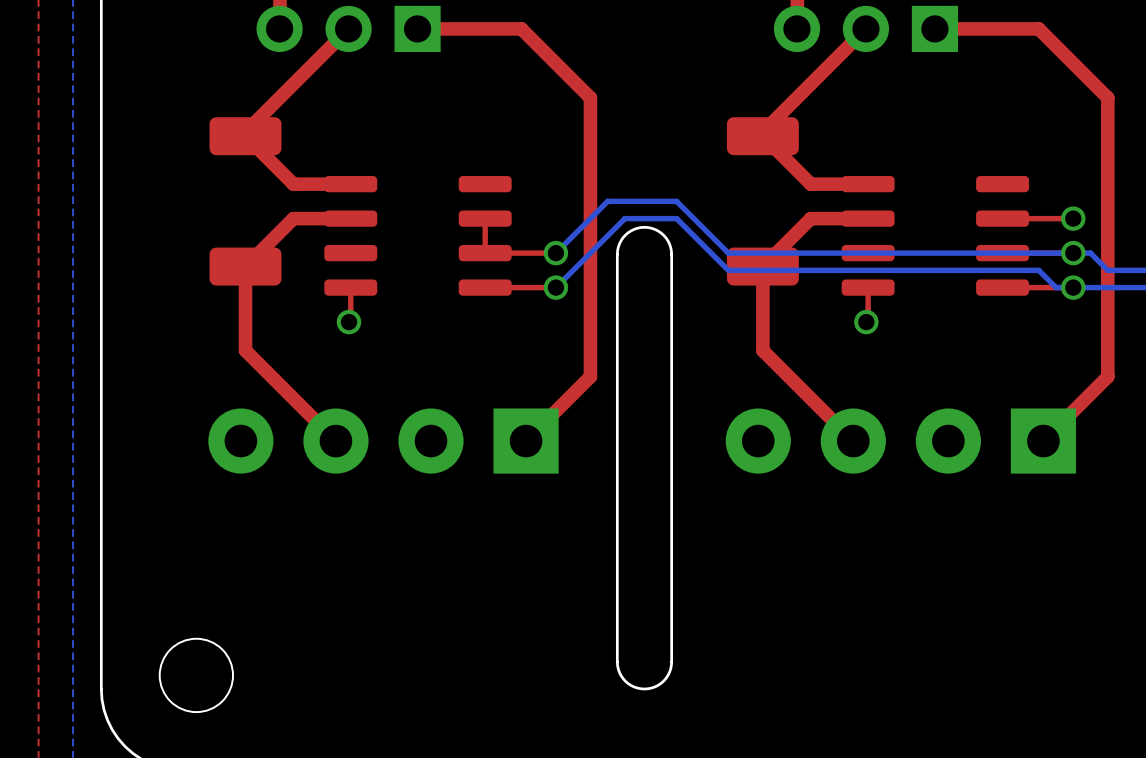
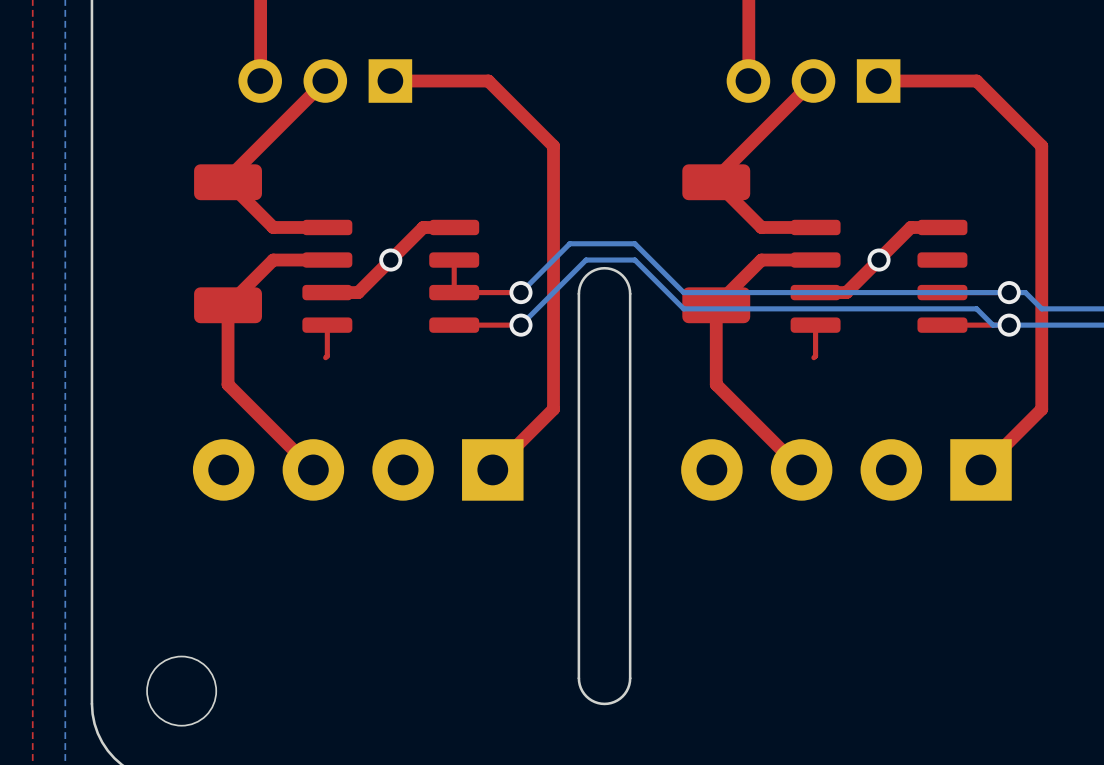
top track: none -> (454, 227) (423, 227) (358, 292) (327, 292)
top track: none -> (942, 227) (910, 227) (846, 292) (815, 292)
via: none -> (879, 260)
top track: (1073, 218) (1002, 218) -> none
via: (1073, 218) -> none
via position: (349, 322) -> (390, 260)
via: (866, 322) -> none

